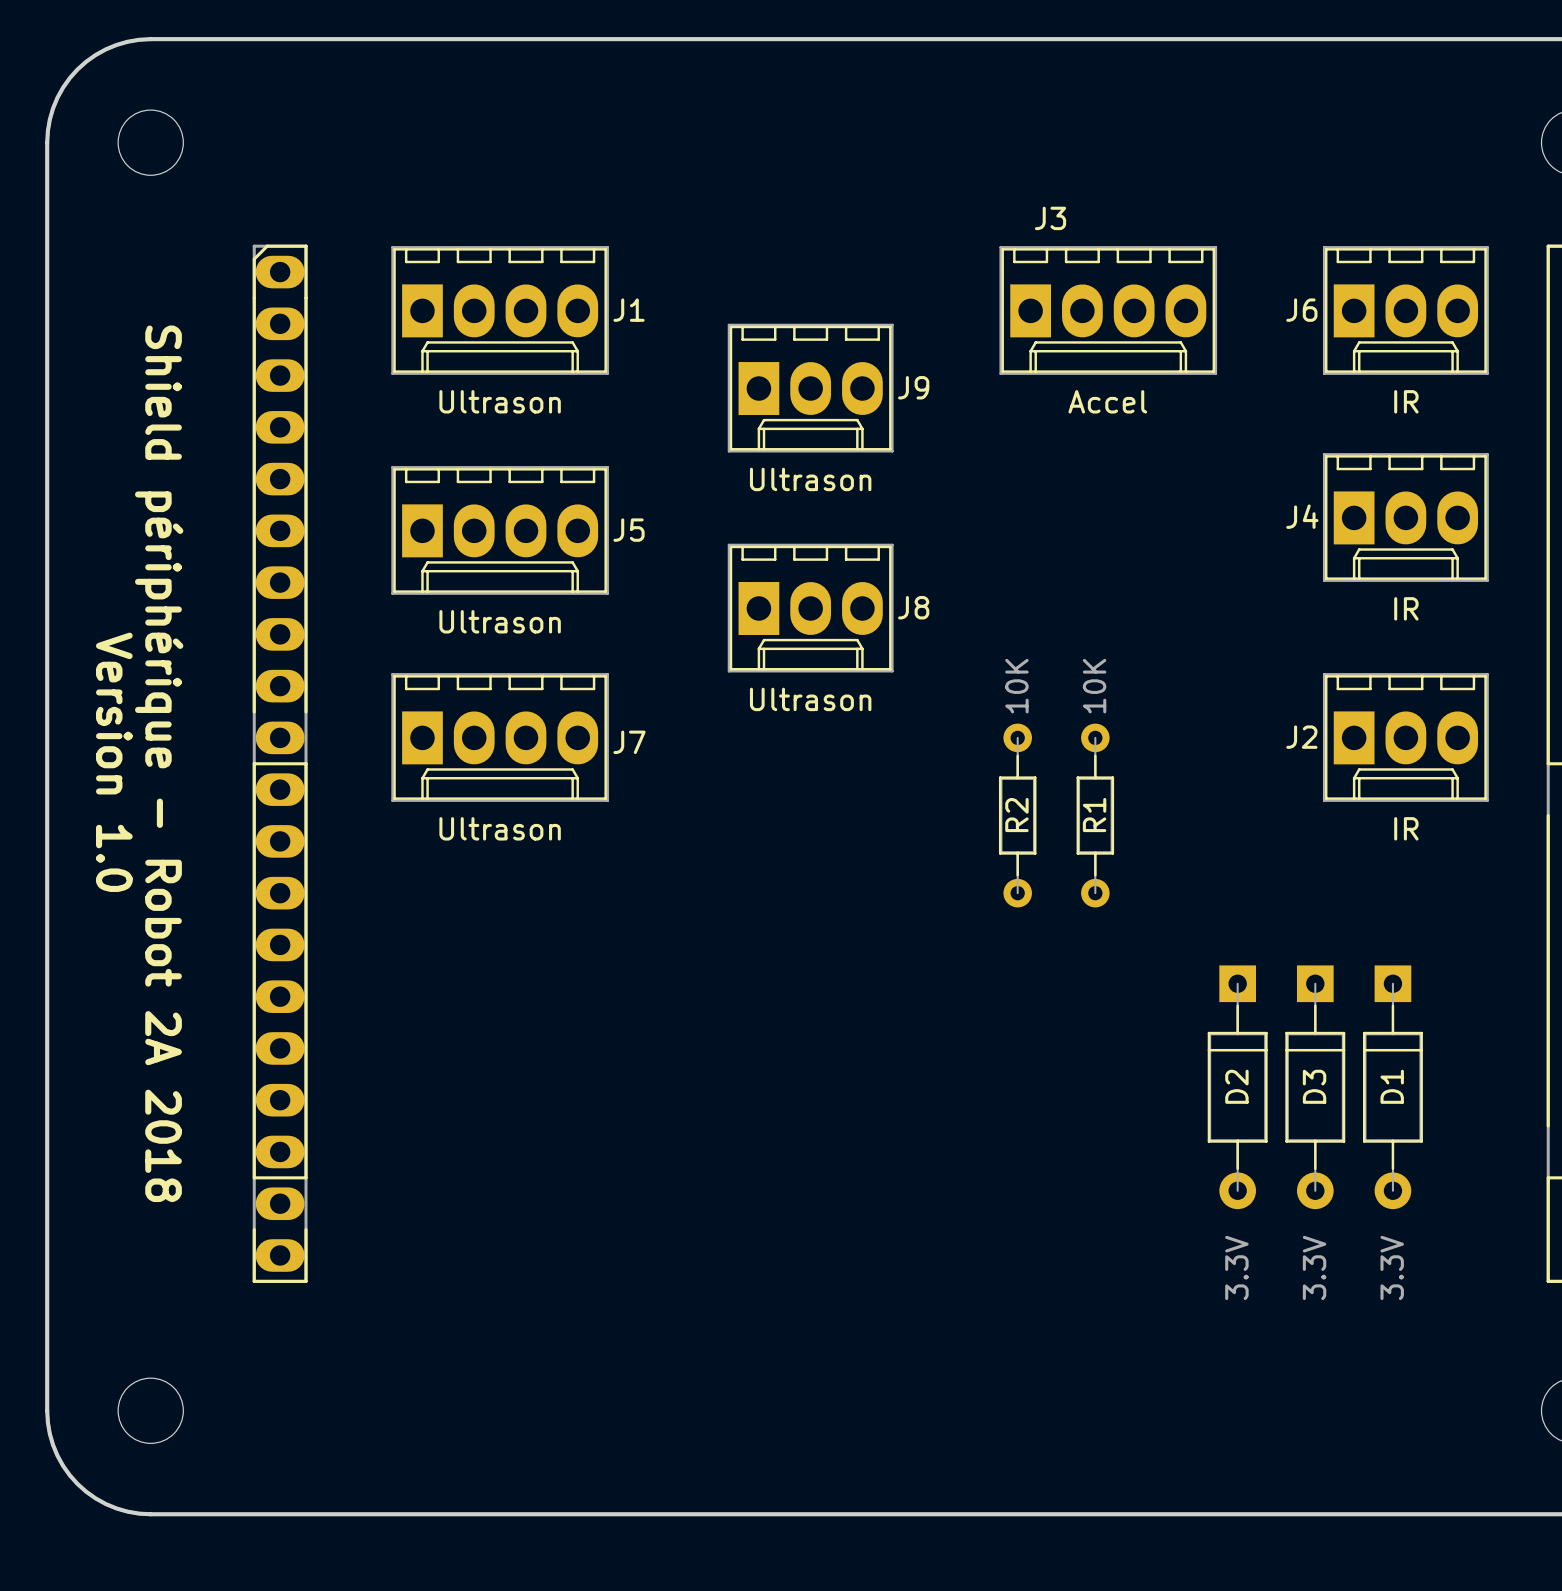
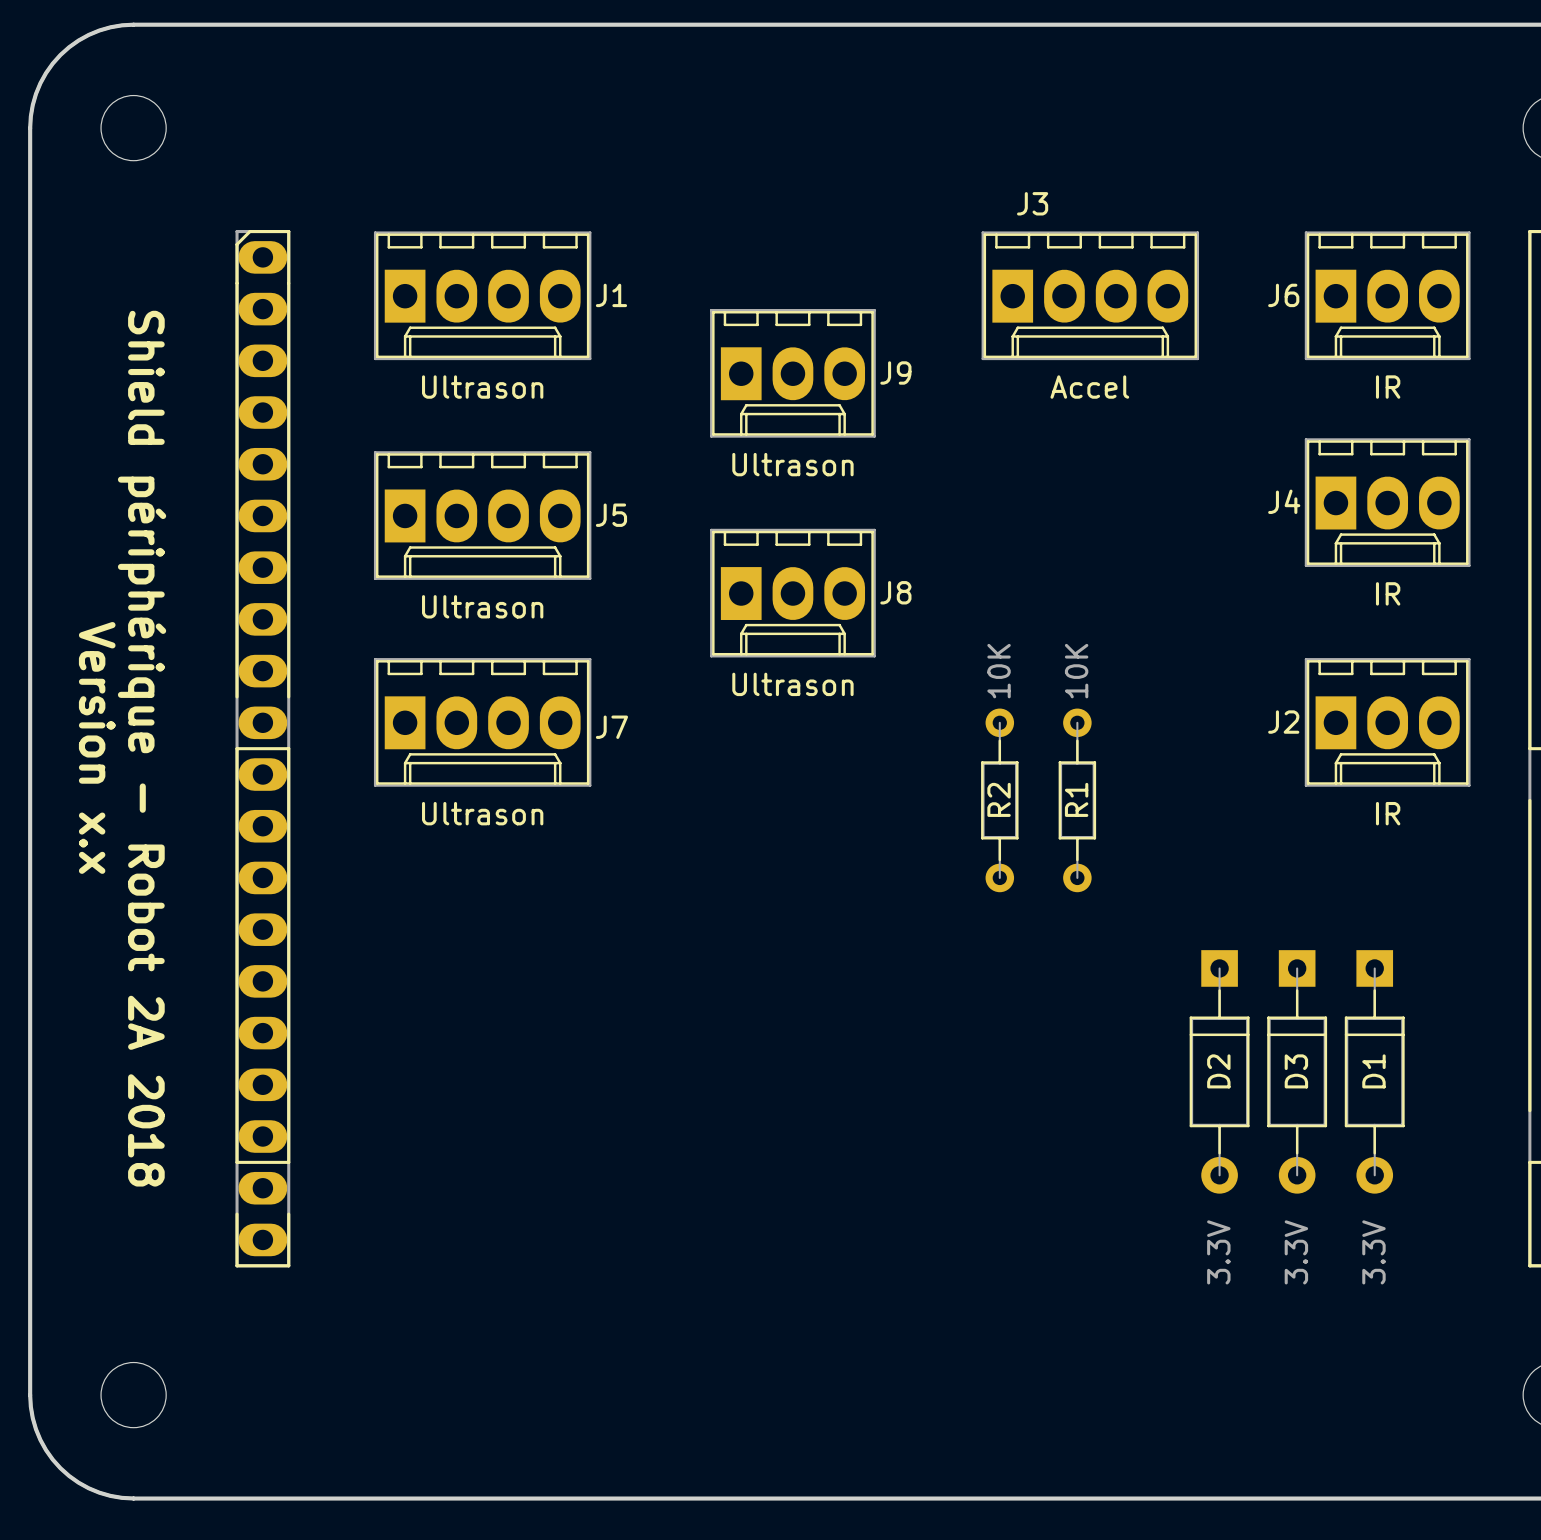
text: Version 1.0 (114, 762) -> Version x.x (97, 747)

